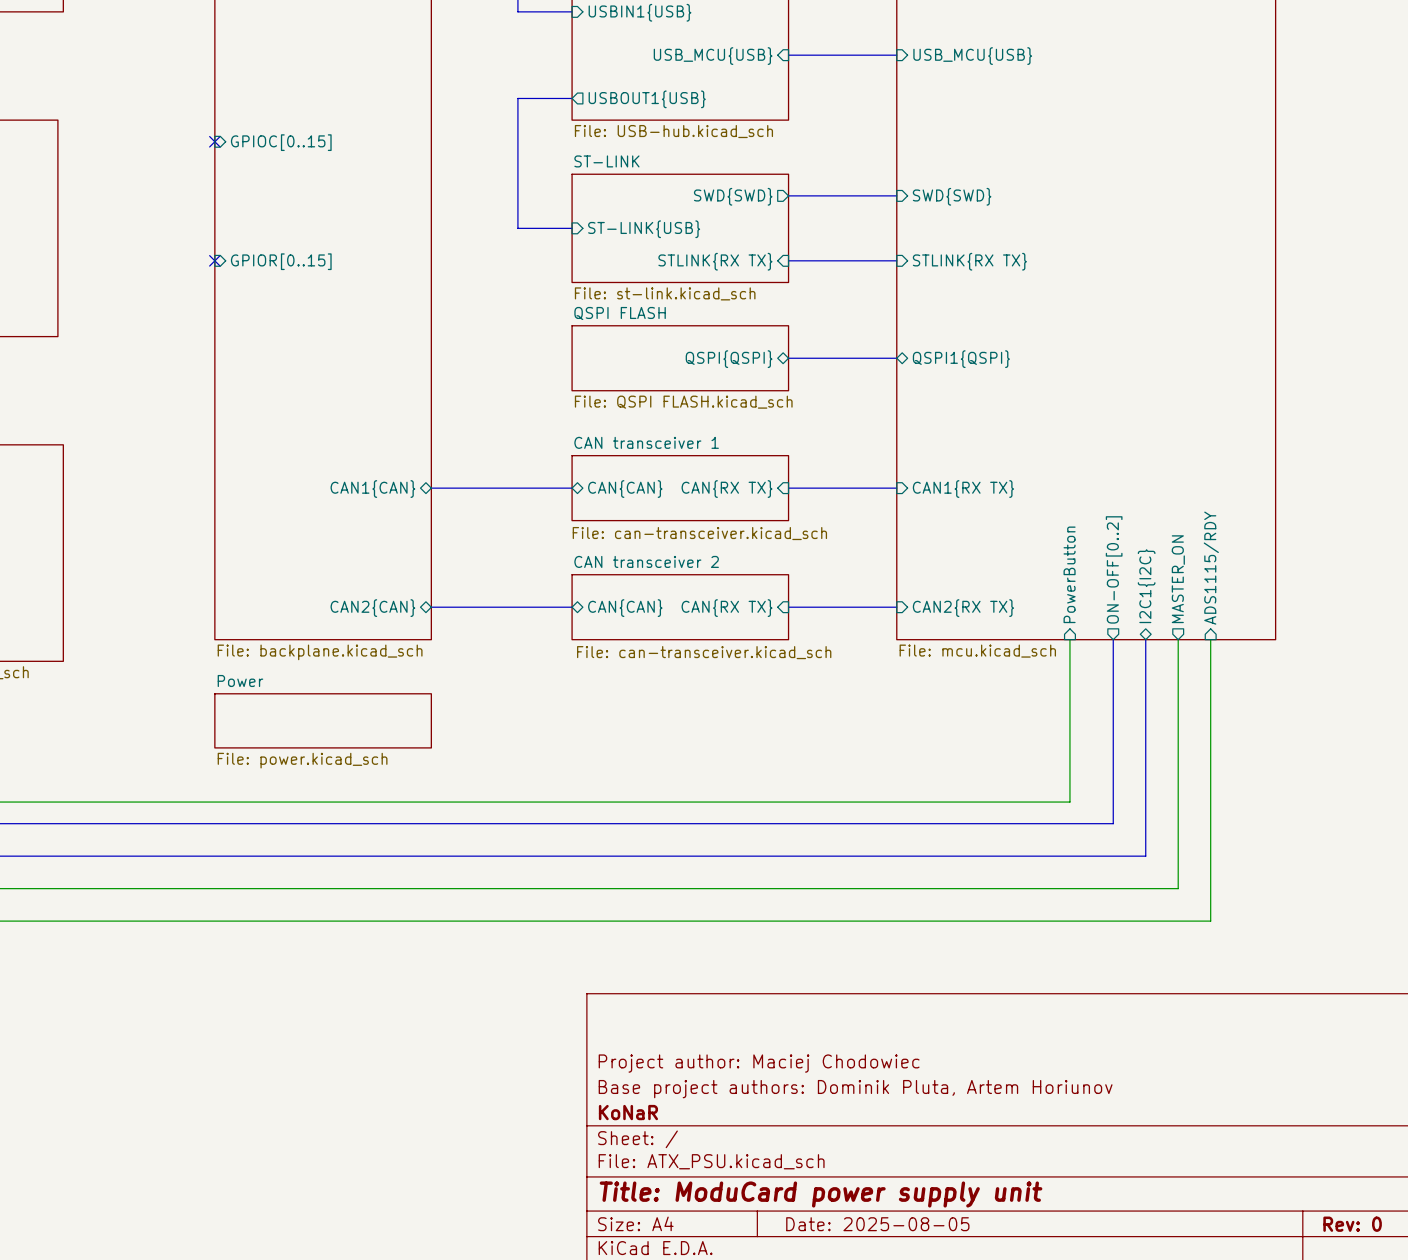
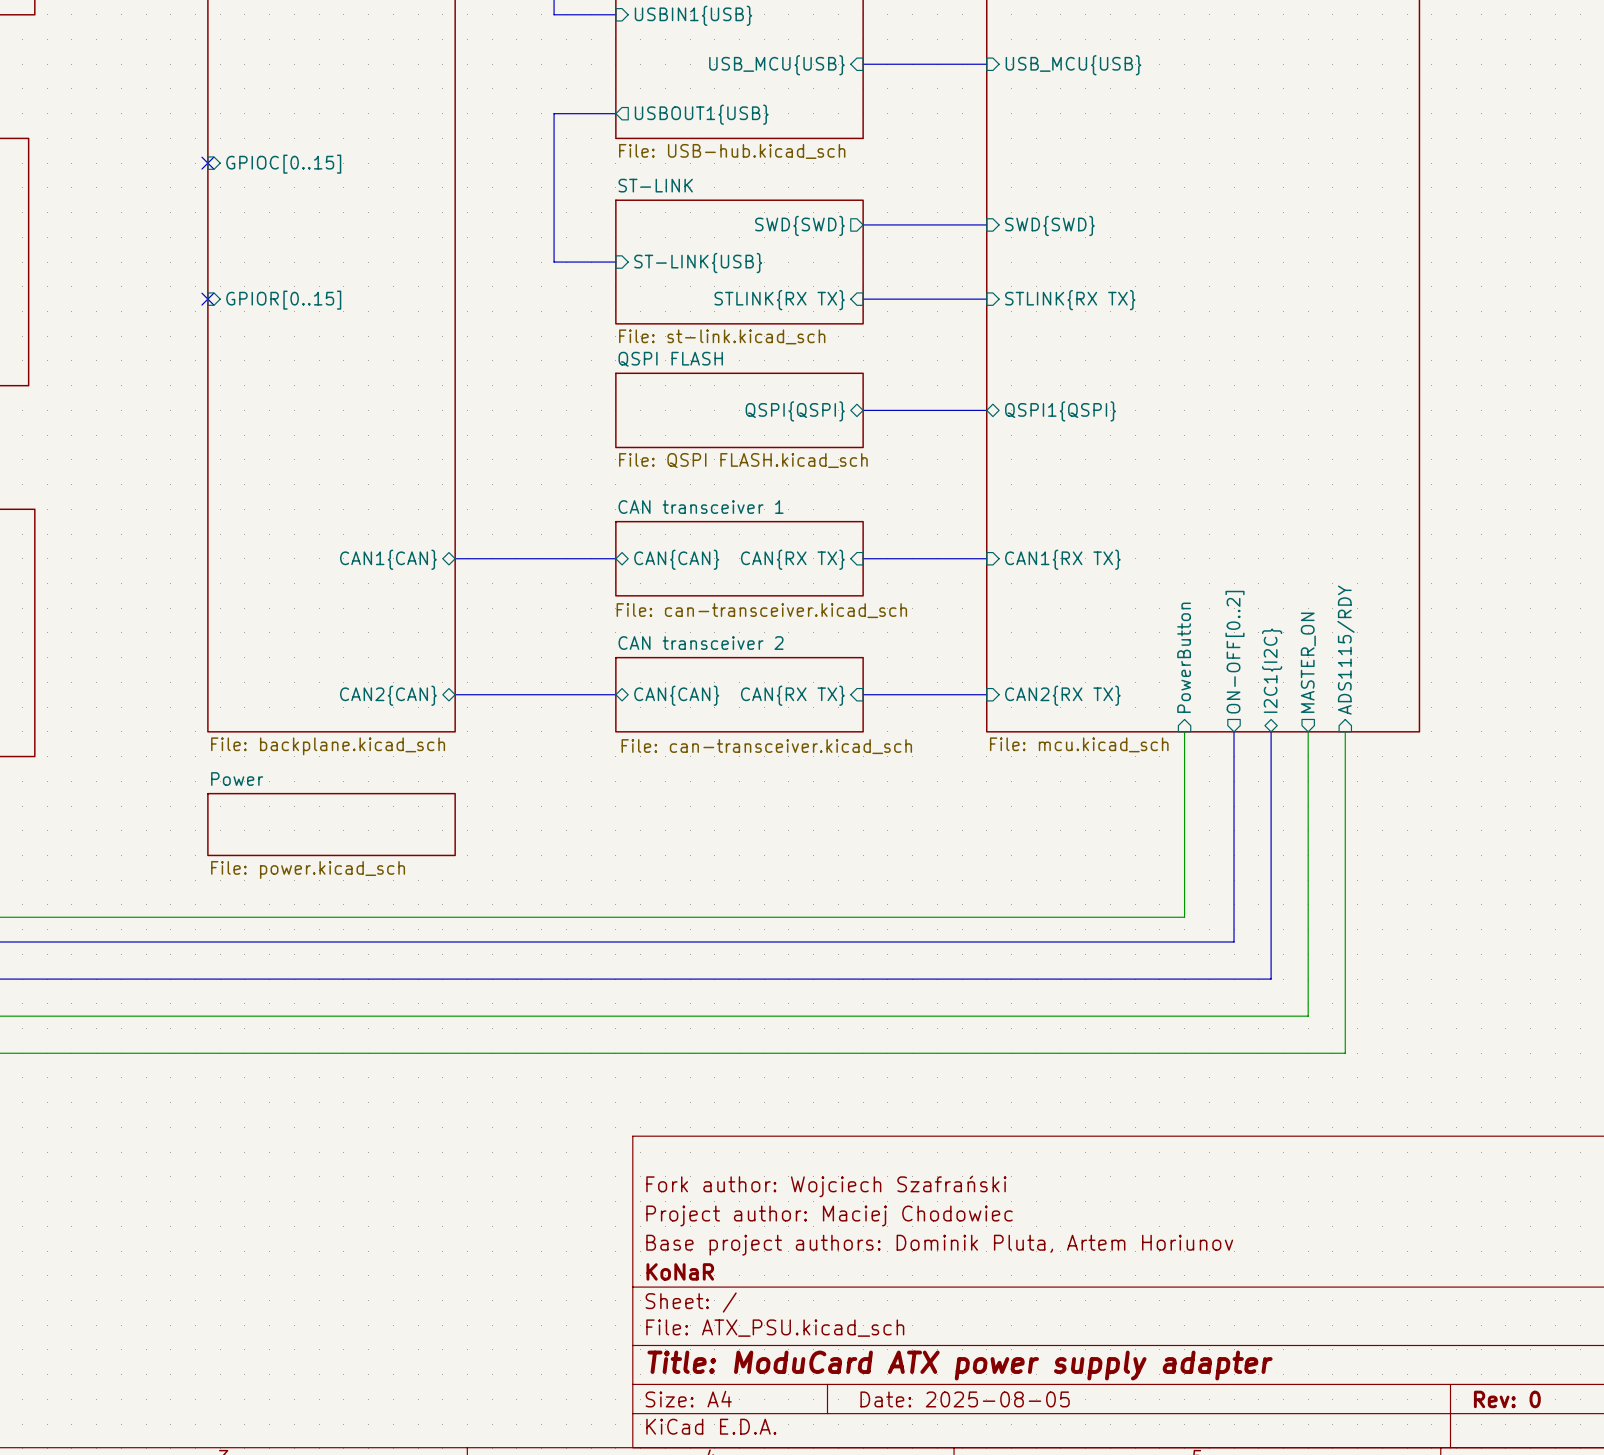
title block: none -> Fork author: Wojciech Szafrański (826, 1186)
title block: Title: ModuCard power supply unit (821, 1194) -> Title: ModuCard ATX power supply adapter (960, 1365)

